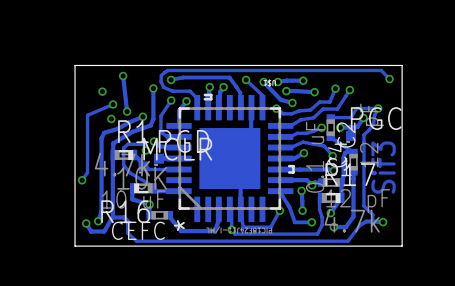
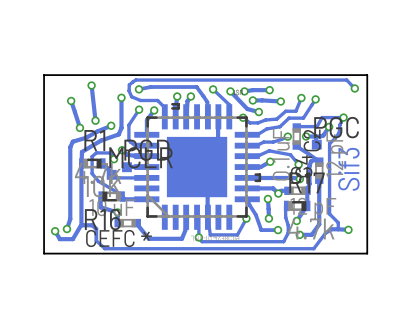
track: none -> (71, 100) (79, 127)
track: (113, 104) (87, 115) (87, 172) (82, 180) -> none
via: (113, 104) -> none
via: (82, 180) -> none

